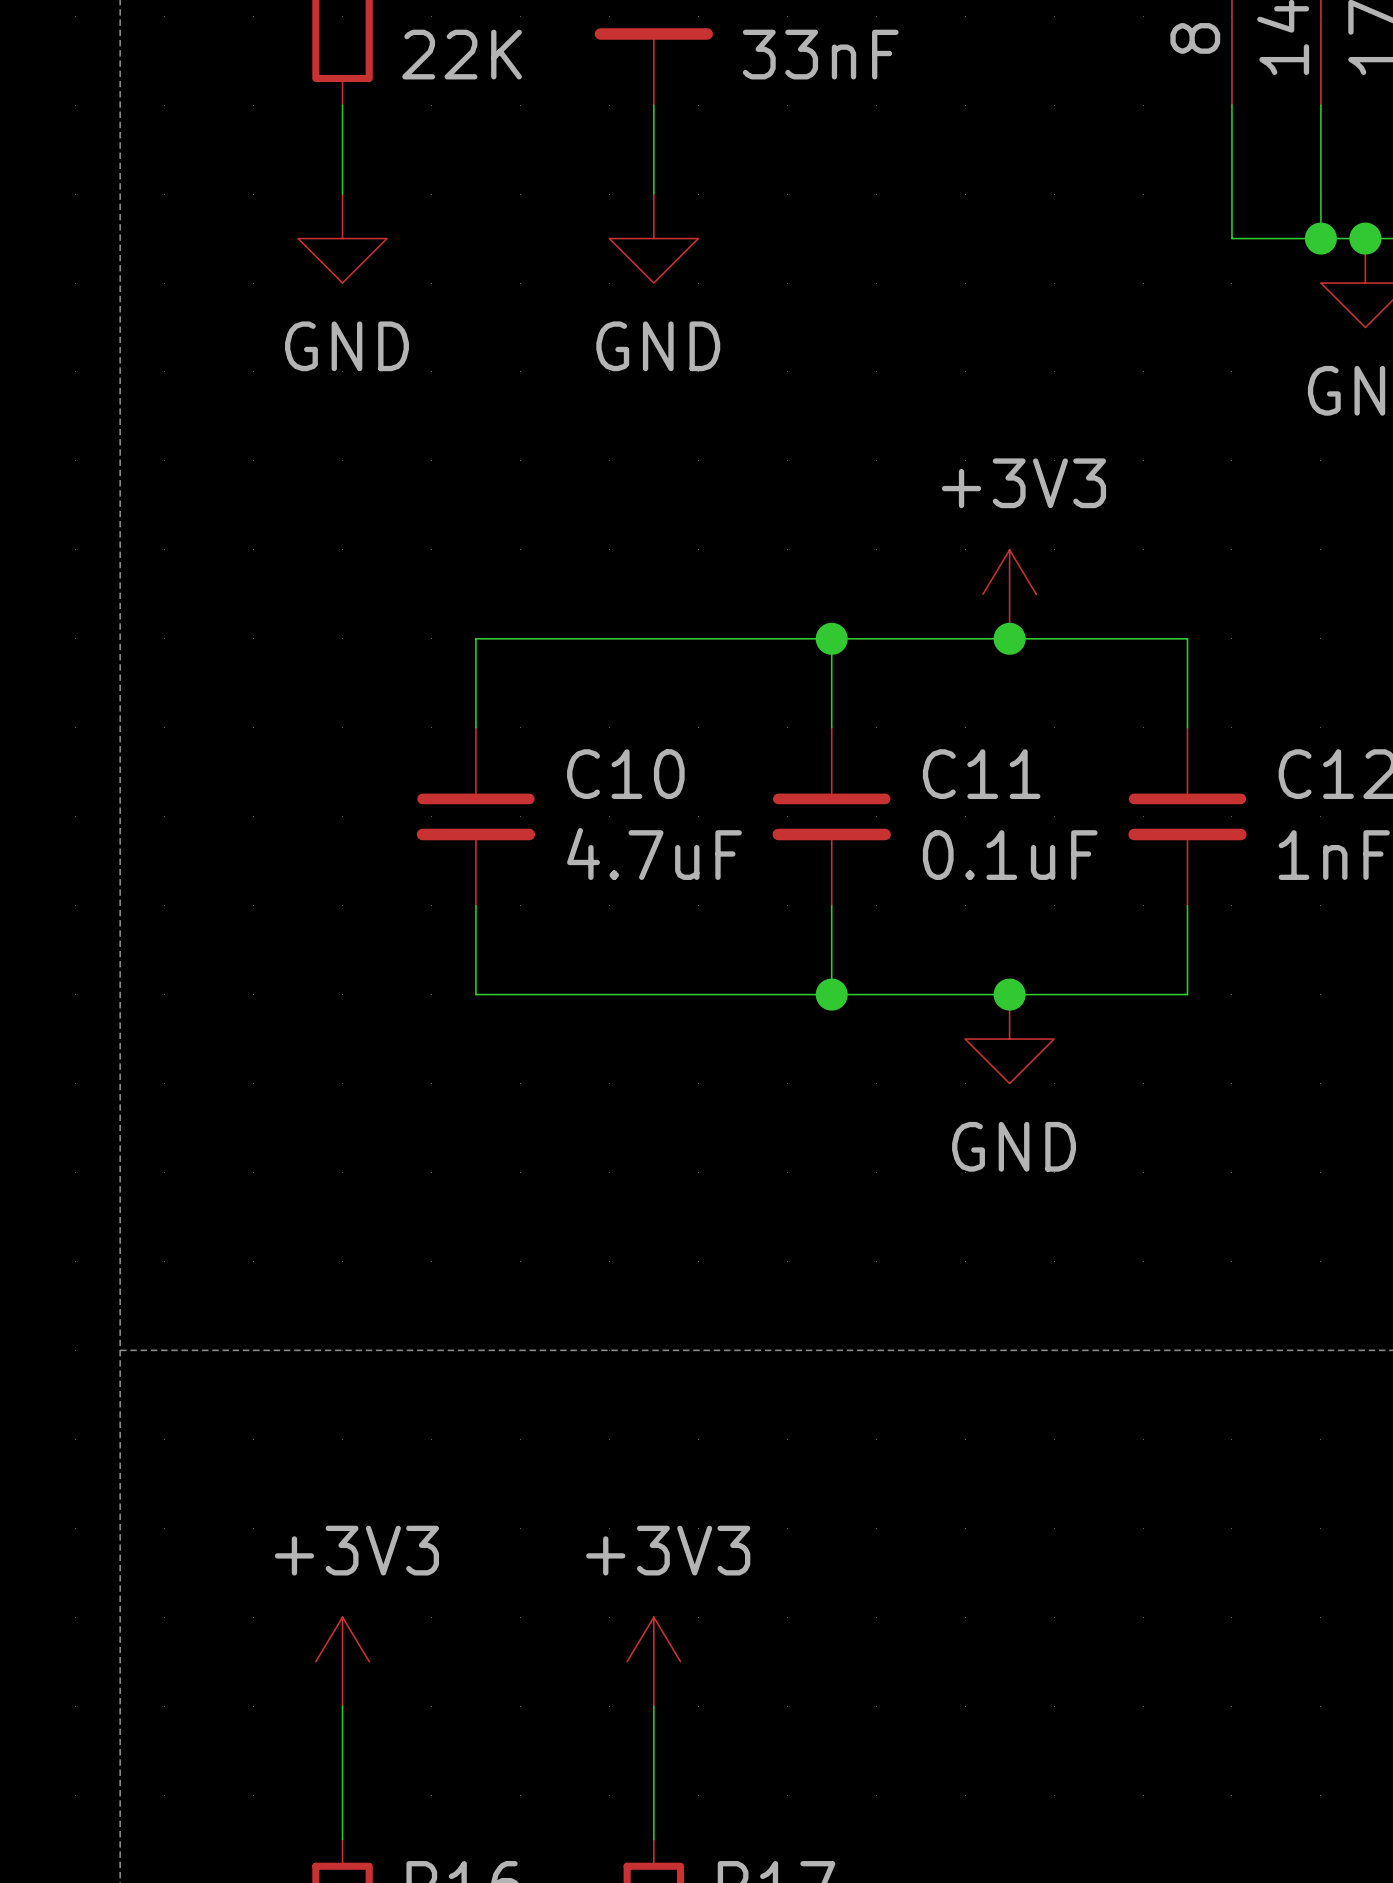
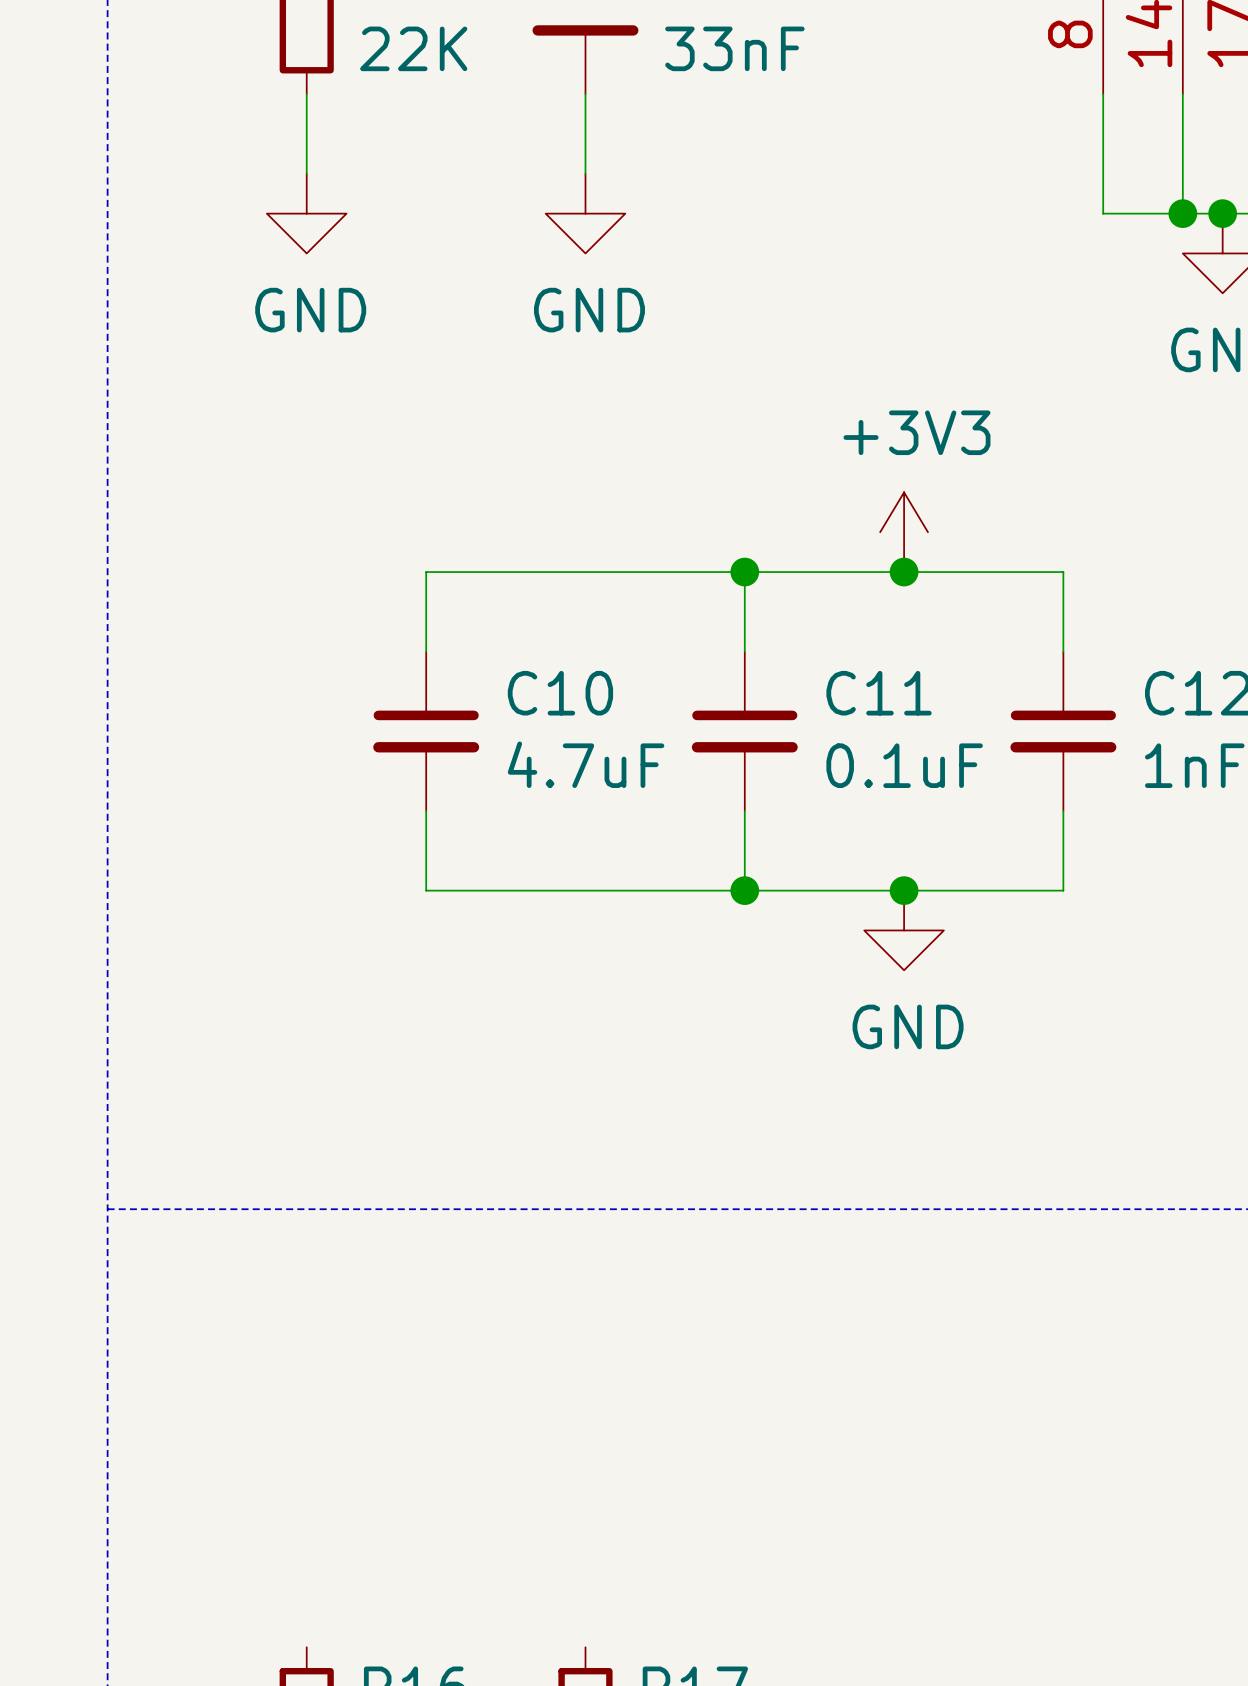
power symbol: +3V3 (342, 1661) -> none
power symbol: +3V3 (653, 1661) -> none
wire: (342, 1706) (342, 1839) -> none
wire: (653, 1706) (653, 1839) -> none

